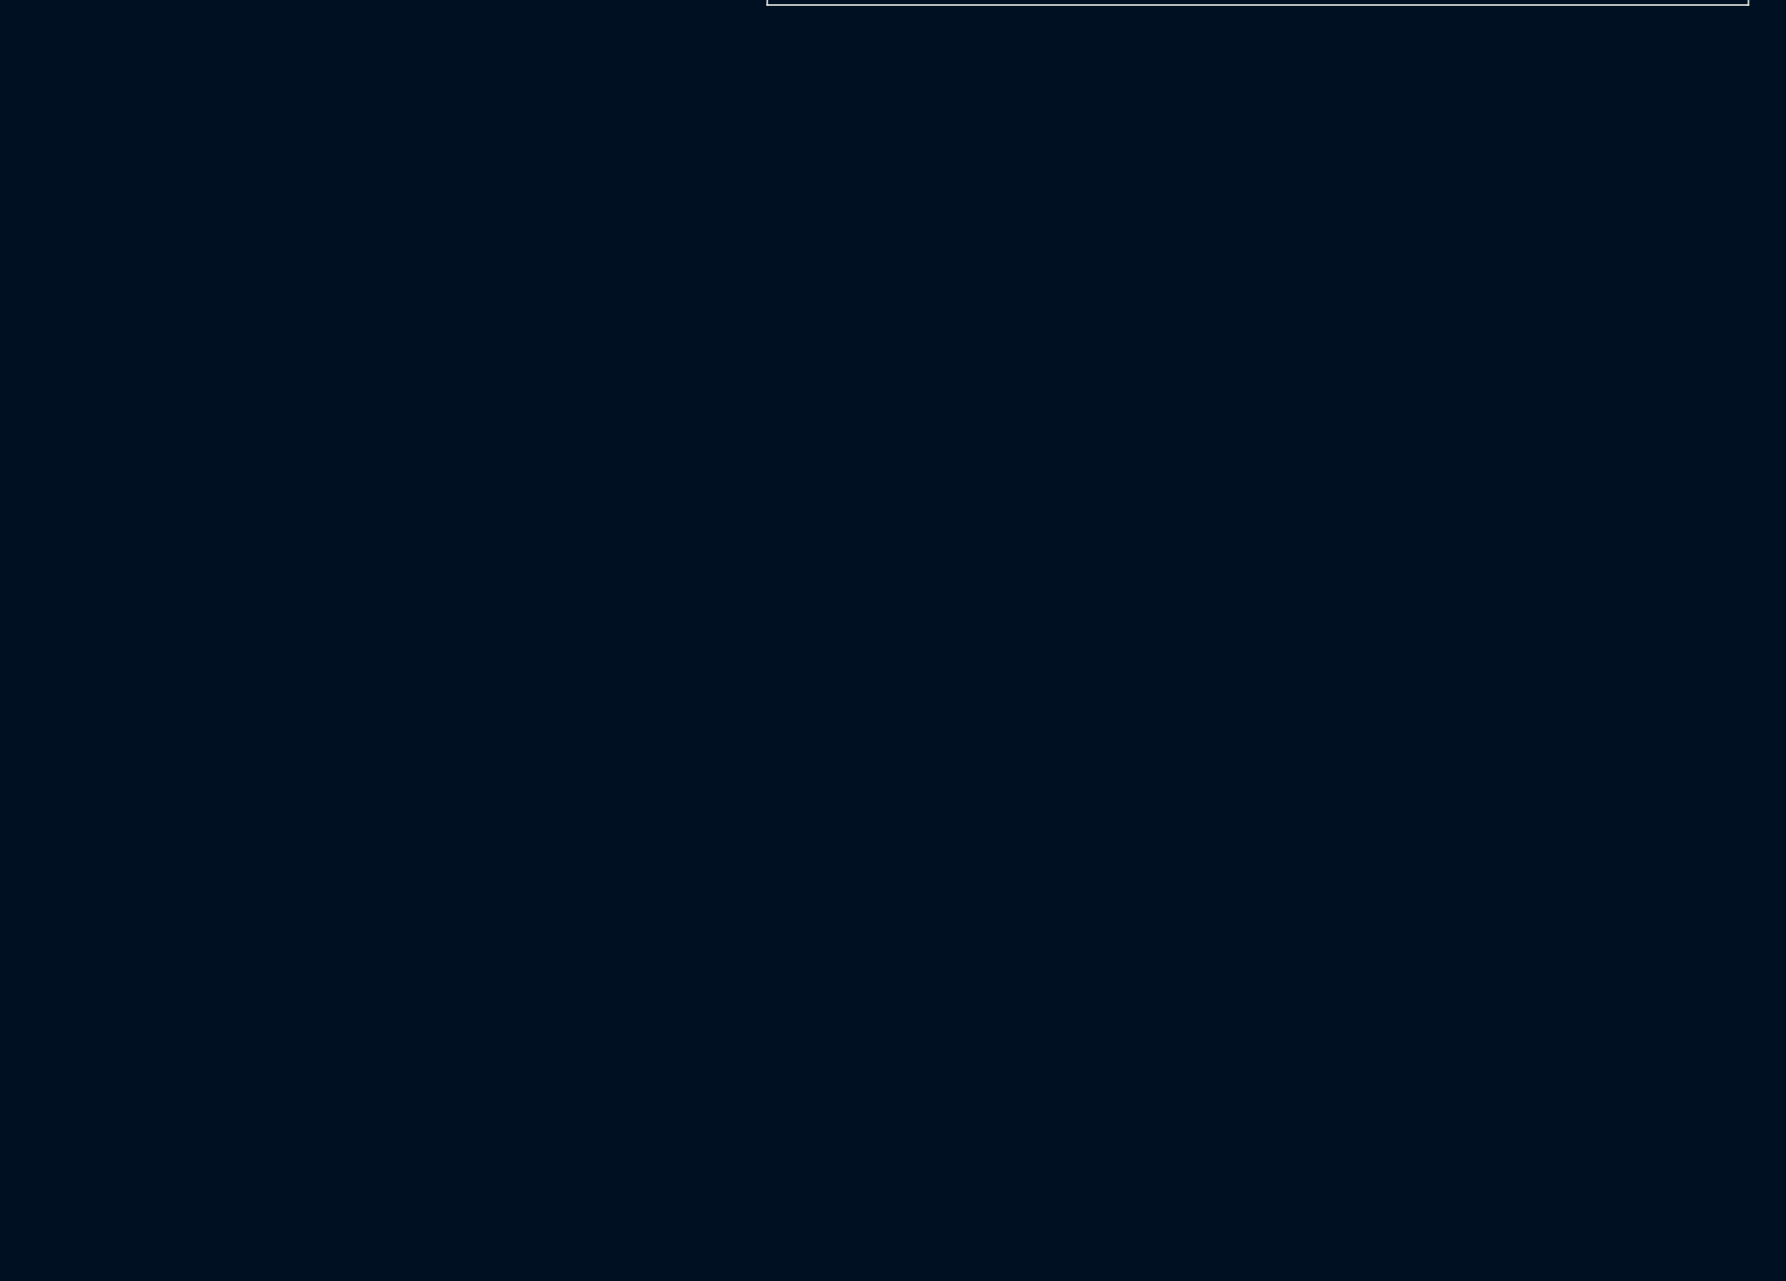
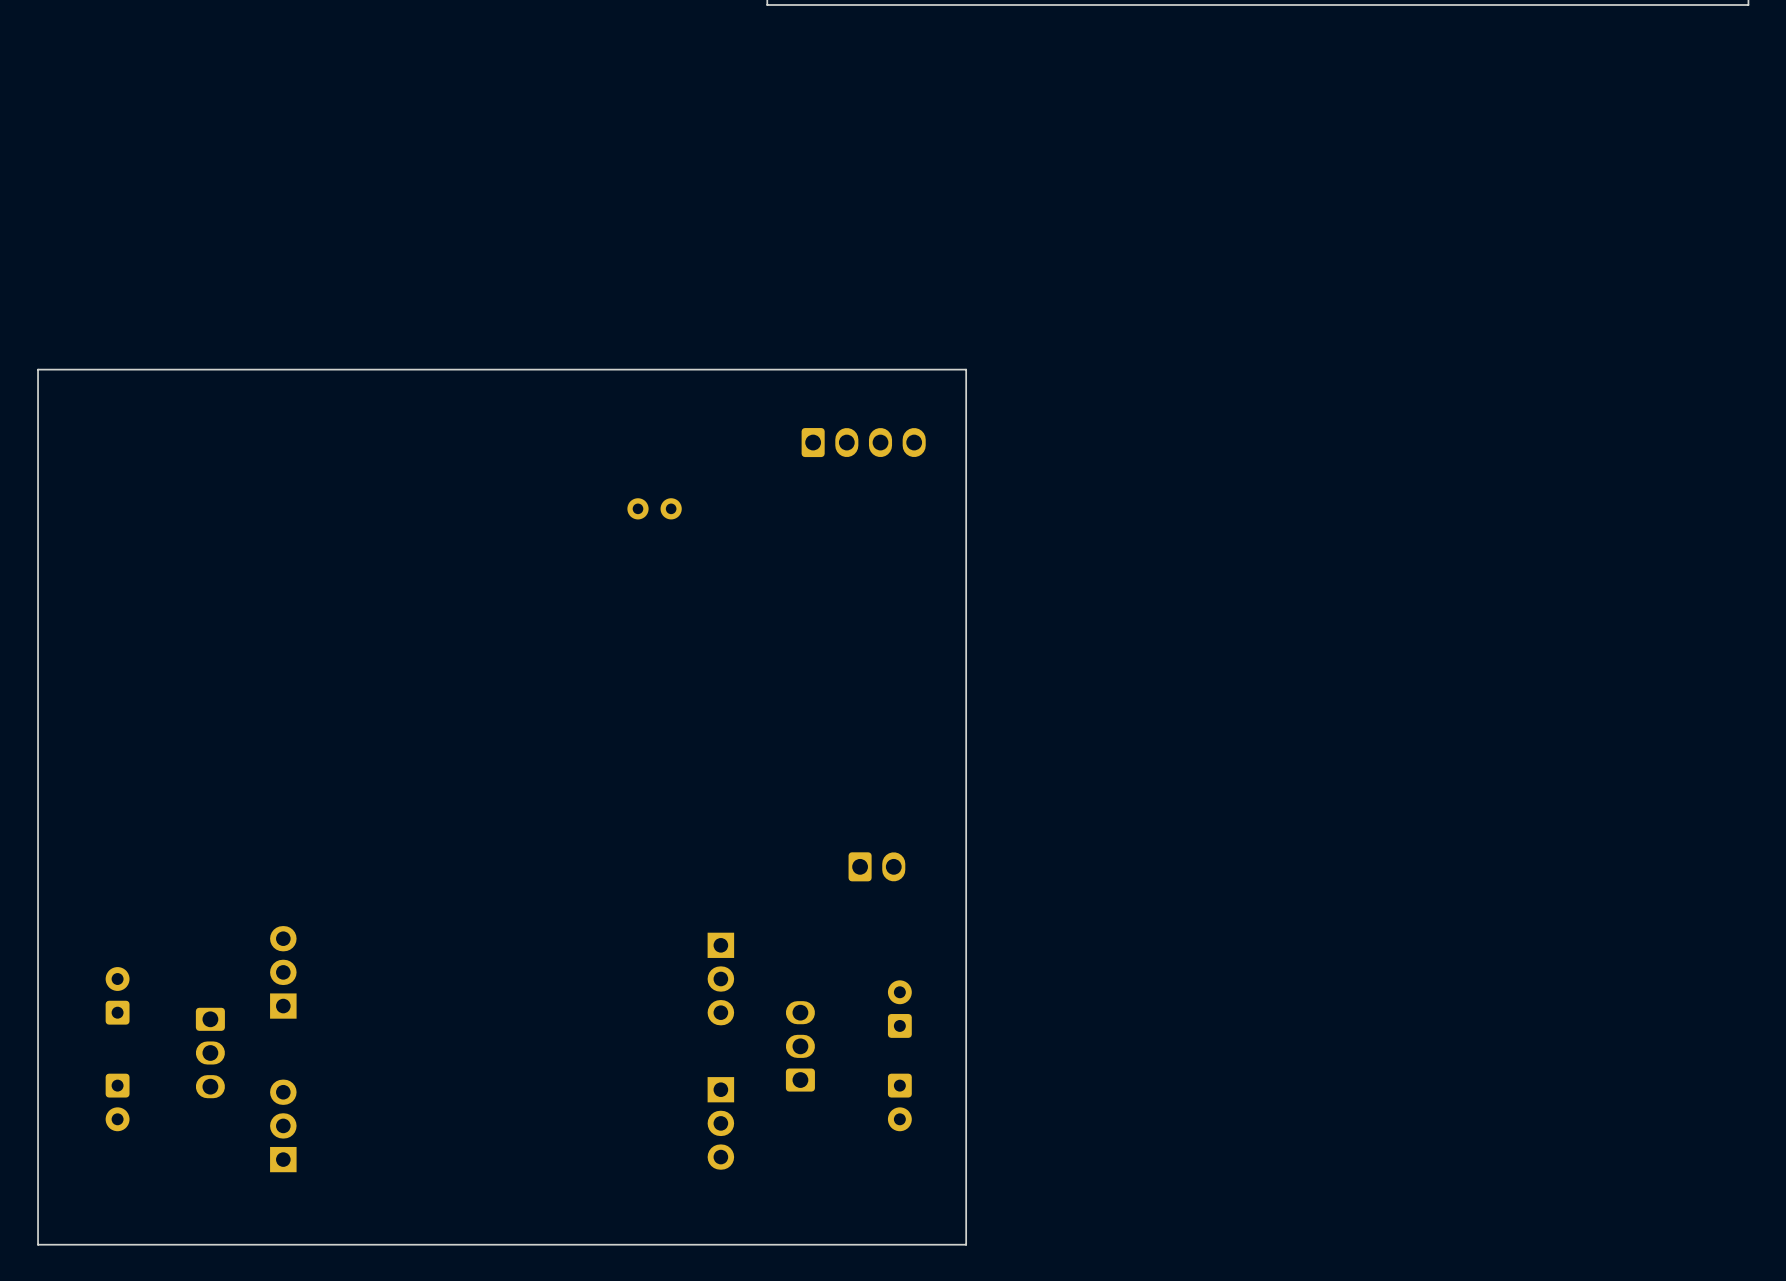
board edge: none -> (966, 369) (38, 369) (38, 1244) (966, 1244) (966, 369)
part: none -> (863, 442)
part: none -> (654, 508)
part: none -> (876, 866)
part: none -> (283, 972)
part: none -> (720, 979)
part: none -> (117, 995)
part: none -> (899, 1009)
part: none -> (800, 1046)
part: none -> (210, 1052)
part: none -> (117, 1102)
part: none -> (899, 1102)
part: none -> (720, 1123)
part: none -> (283, 1125)

